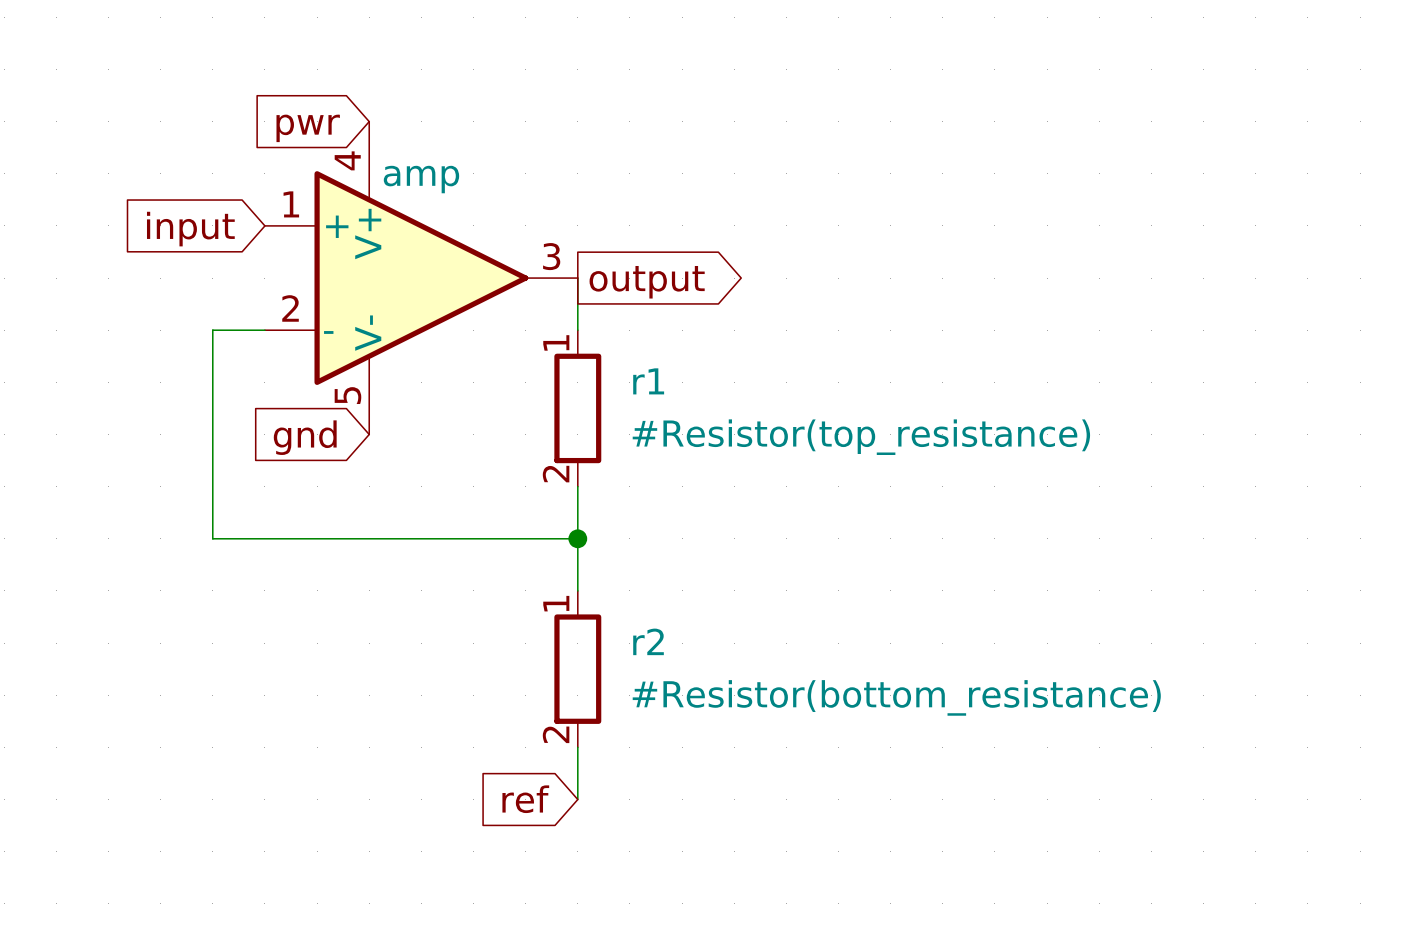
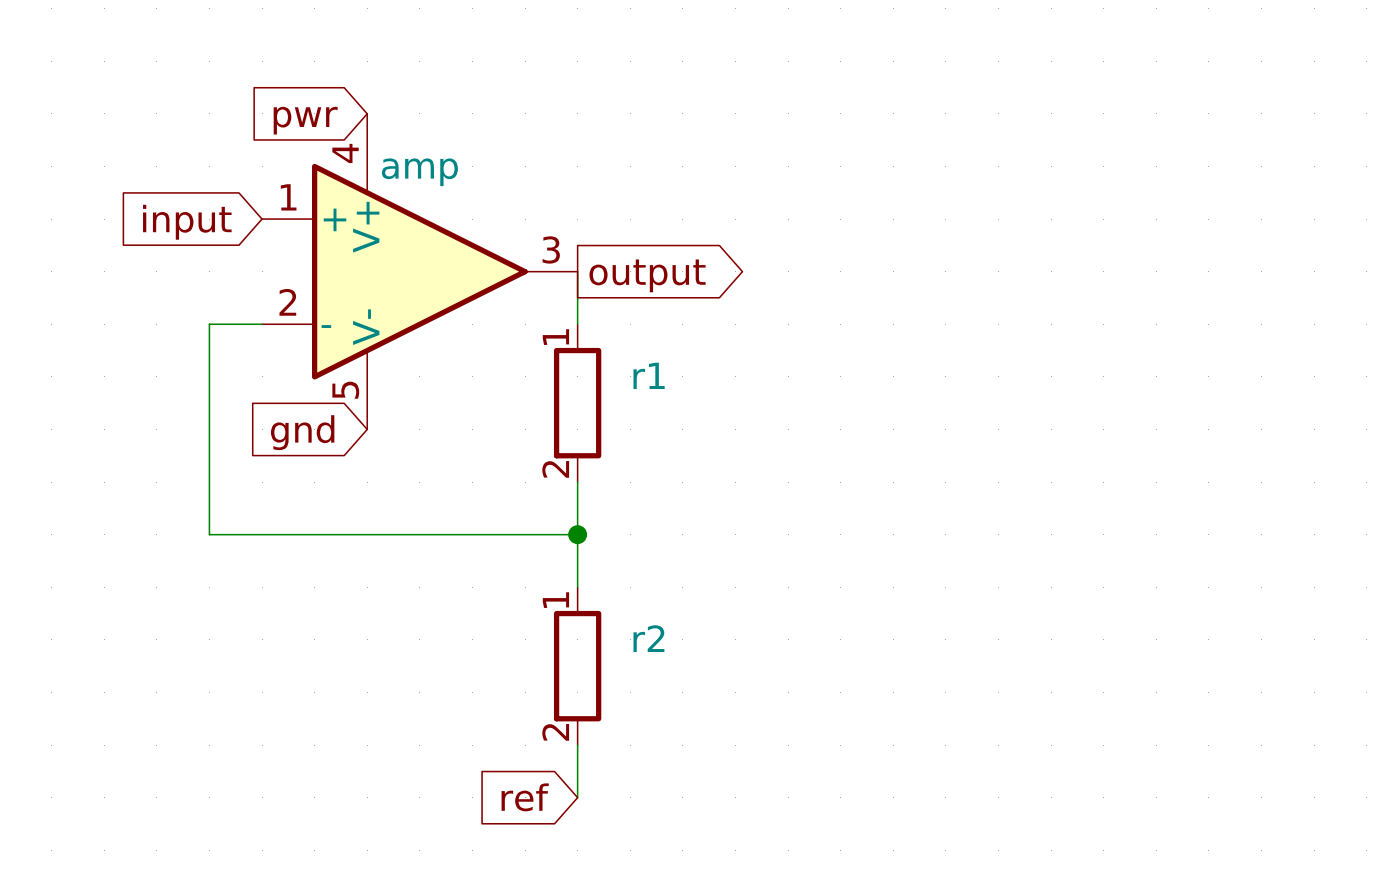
r1 value: #Resistor(top_resistance) (861, 437) -> none
r2 value: #Resistor(bottom_resistance) (896, 697) -> none

